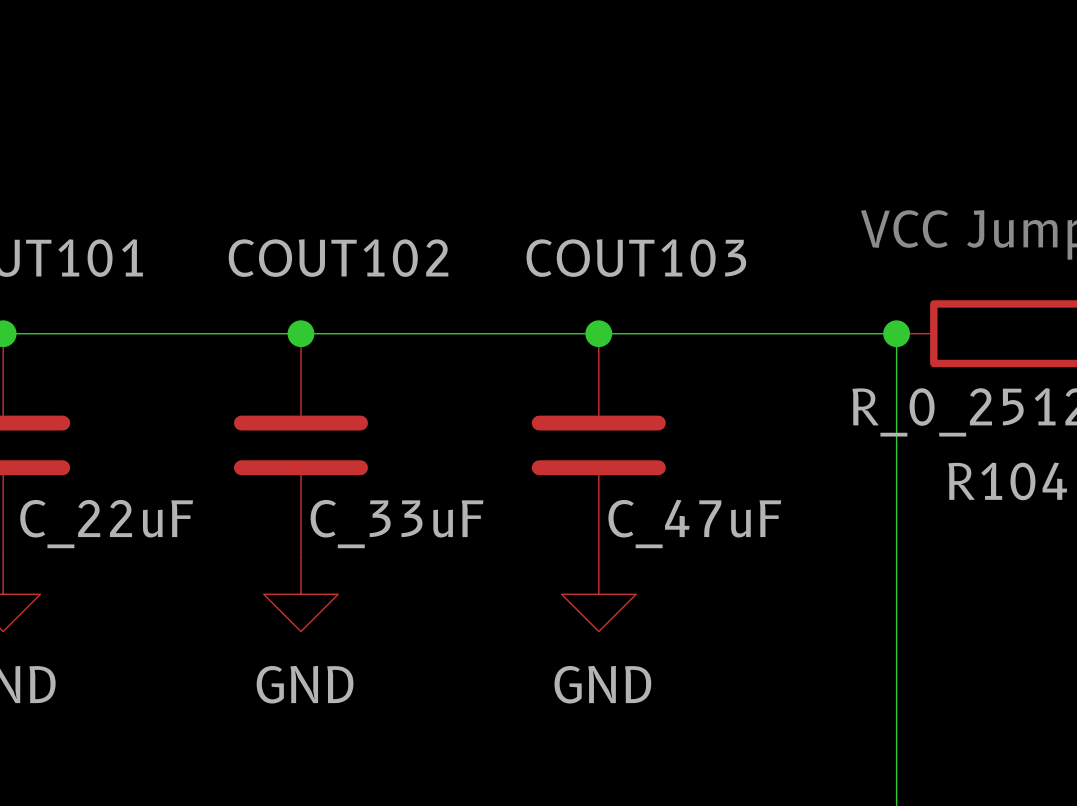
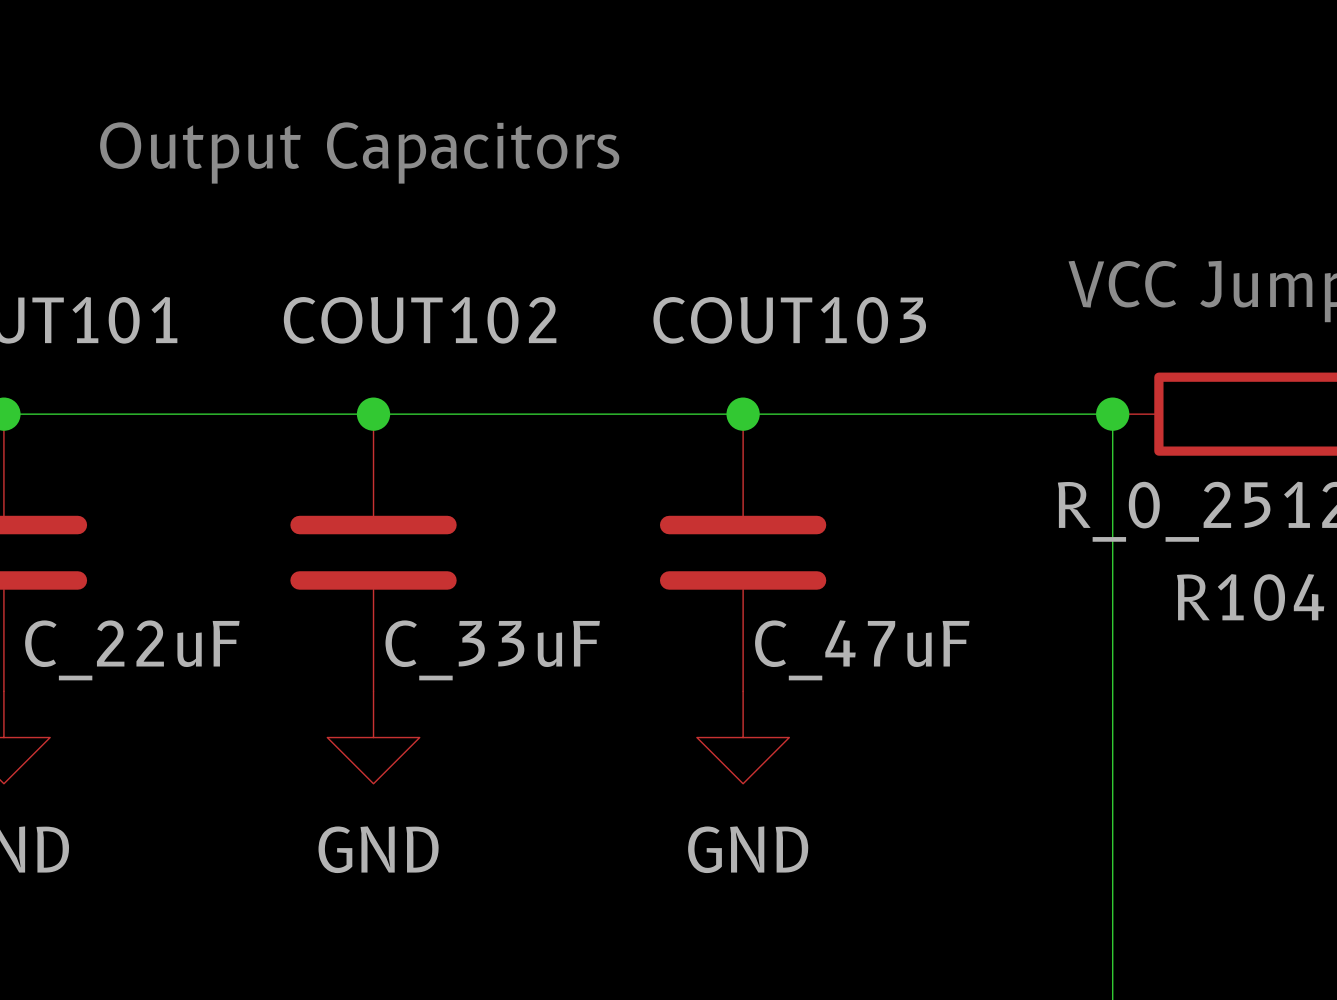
text: none -> Output Capacitors (359, 152)

